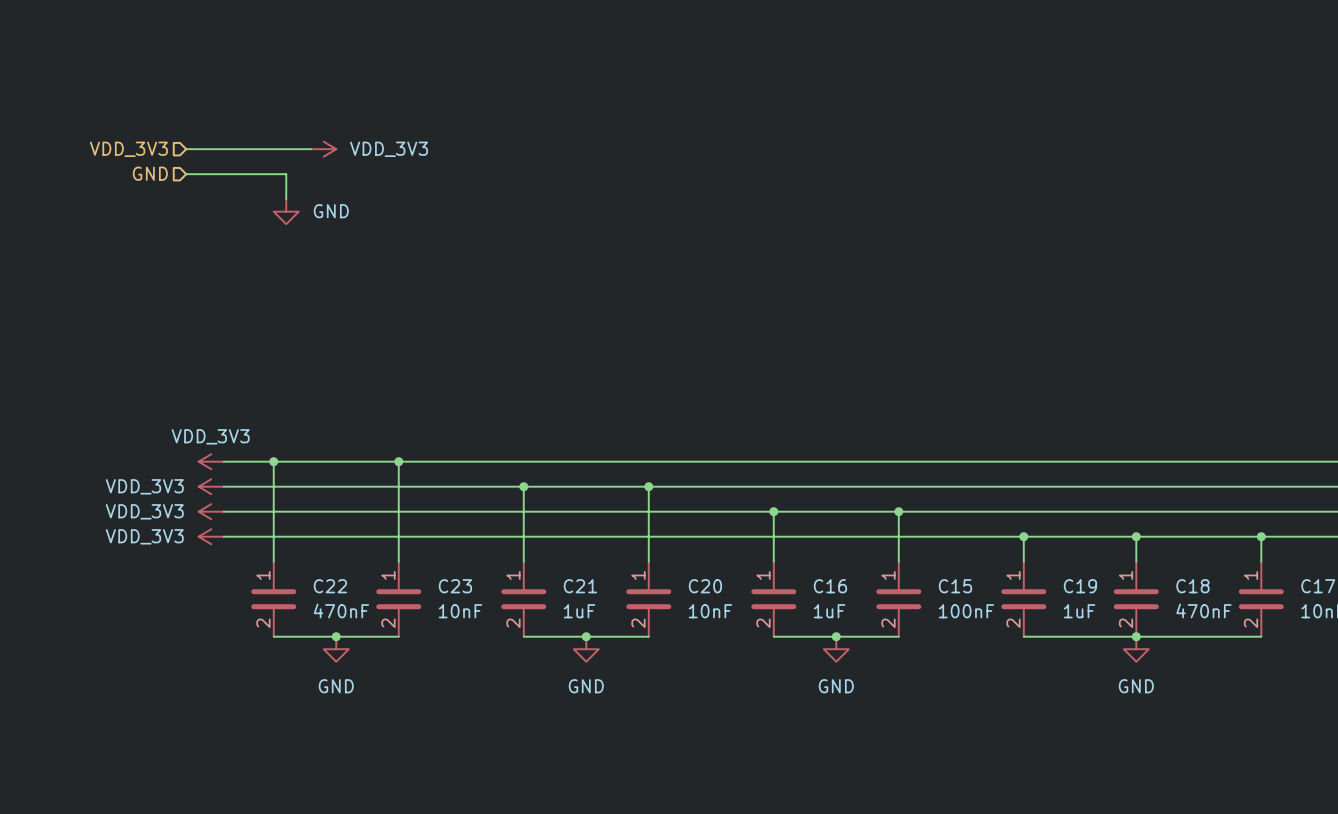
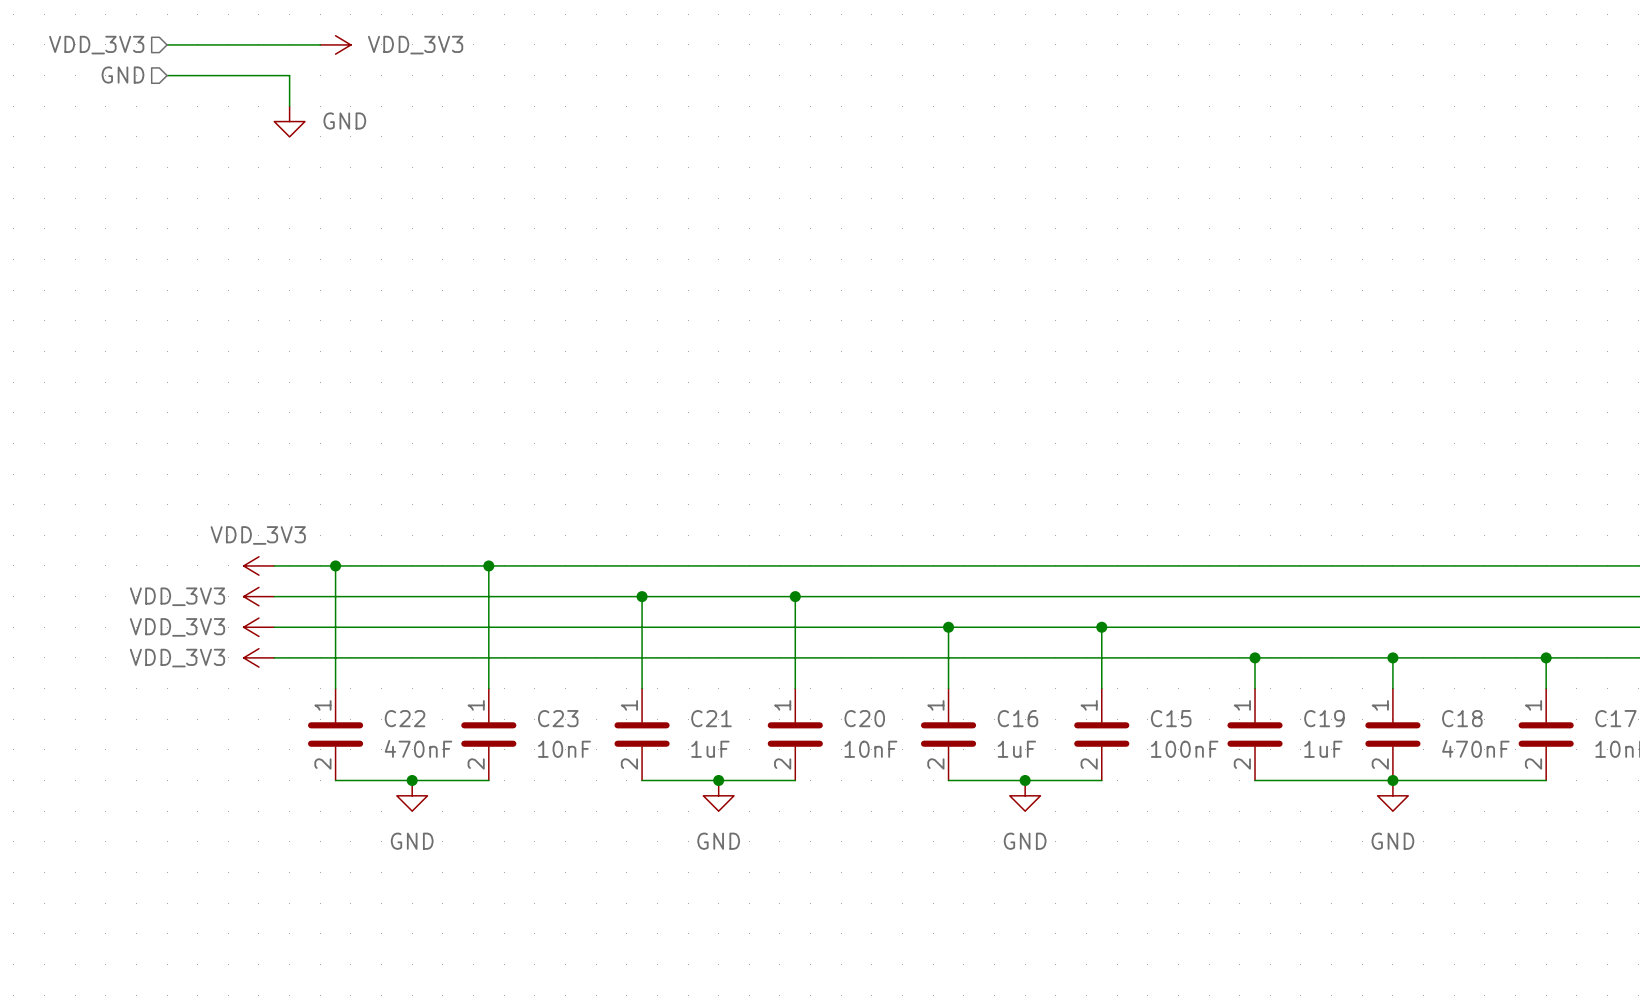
hierarchical label position: VDD_3V3 (128, 149) -> VDD_3V3 (96, 45)
wire: (186, 149) (311, 149) -> (167, 44) (320, 44)
power symbol position: VDD_3V3 (323, 149) -> VDD_3V3 (335, 44)
hierarchical label position: GND (150, 173) -> GND (122, 75)
wire: (186, 174) (286, 174) (286, 199) -> (167, 75) (289, 75) (289, 106)
power symbol position: GND (286, 211) -> GND (289, 121)

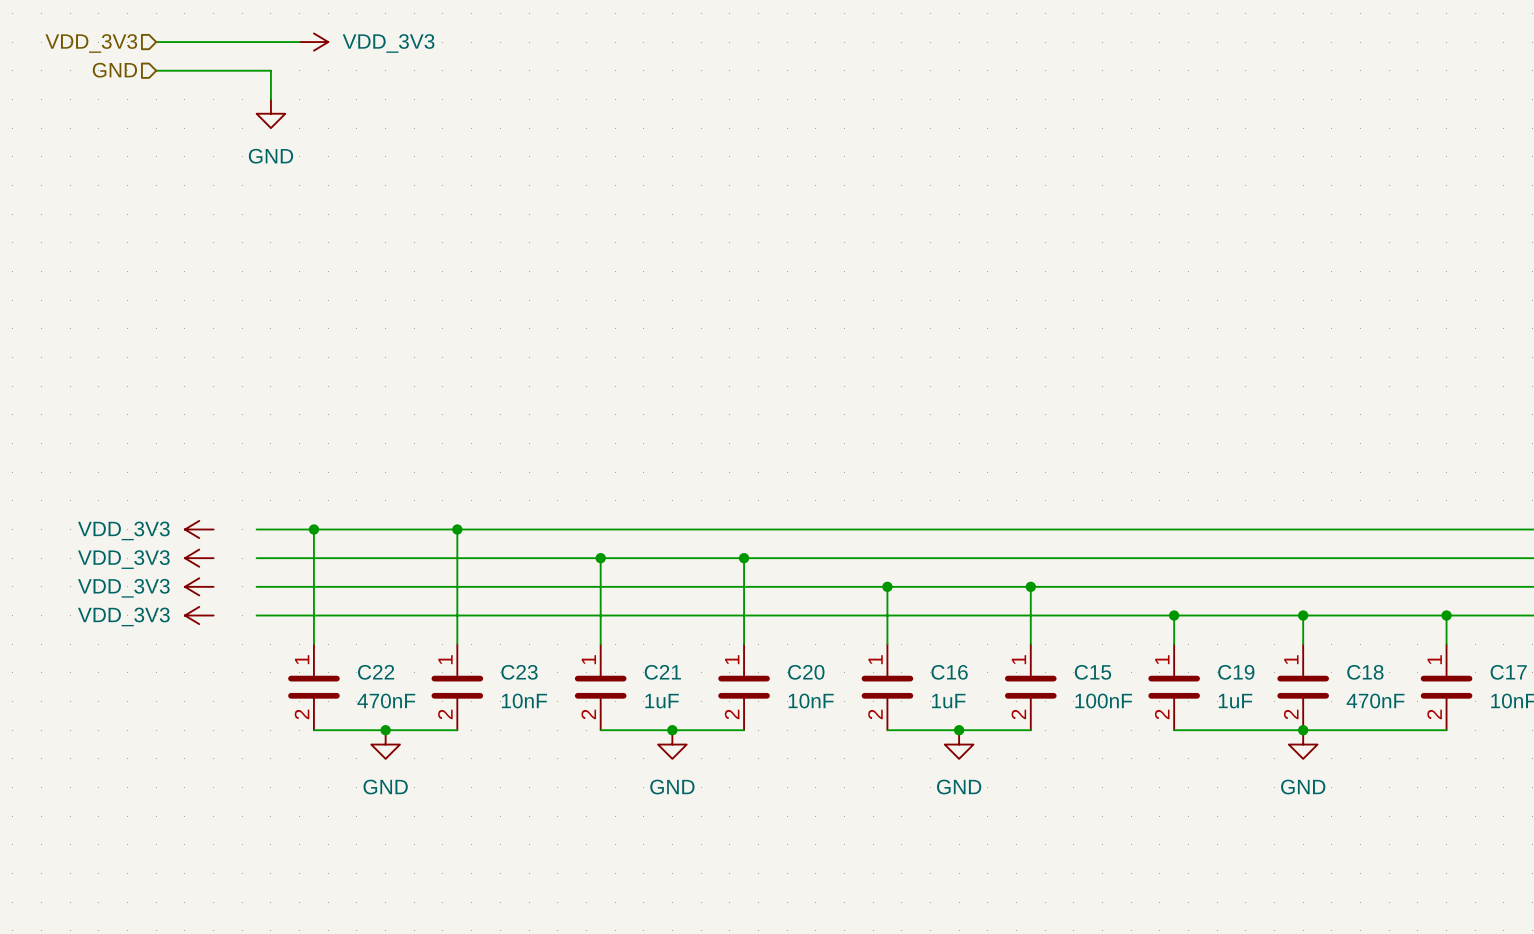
power symbol text position: GND (344, 120) -> GND (270, 156)
power symbol: none -> VDD_3V3 (199, 529)
power symbol: VDD_3V3 (258, 565) -> none
power symbol: none -> VDD_3V3 (199, 558)
power symbol: VDD_3V3 (258, 596) -> none
power symbol: none -> VDD_3V3 (199, 586)
power symbol: VDD_3V3 (258, 627) -> none
power symbol: none -> VDD_3V3 (199, 615)
power symbol: VDD_3V3 (258, 657) -> none

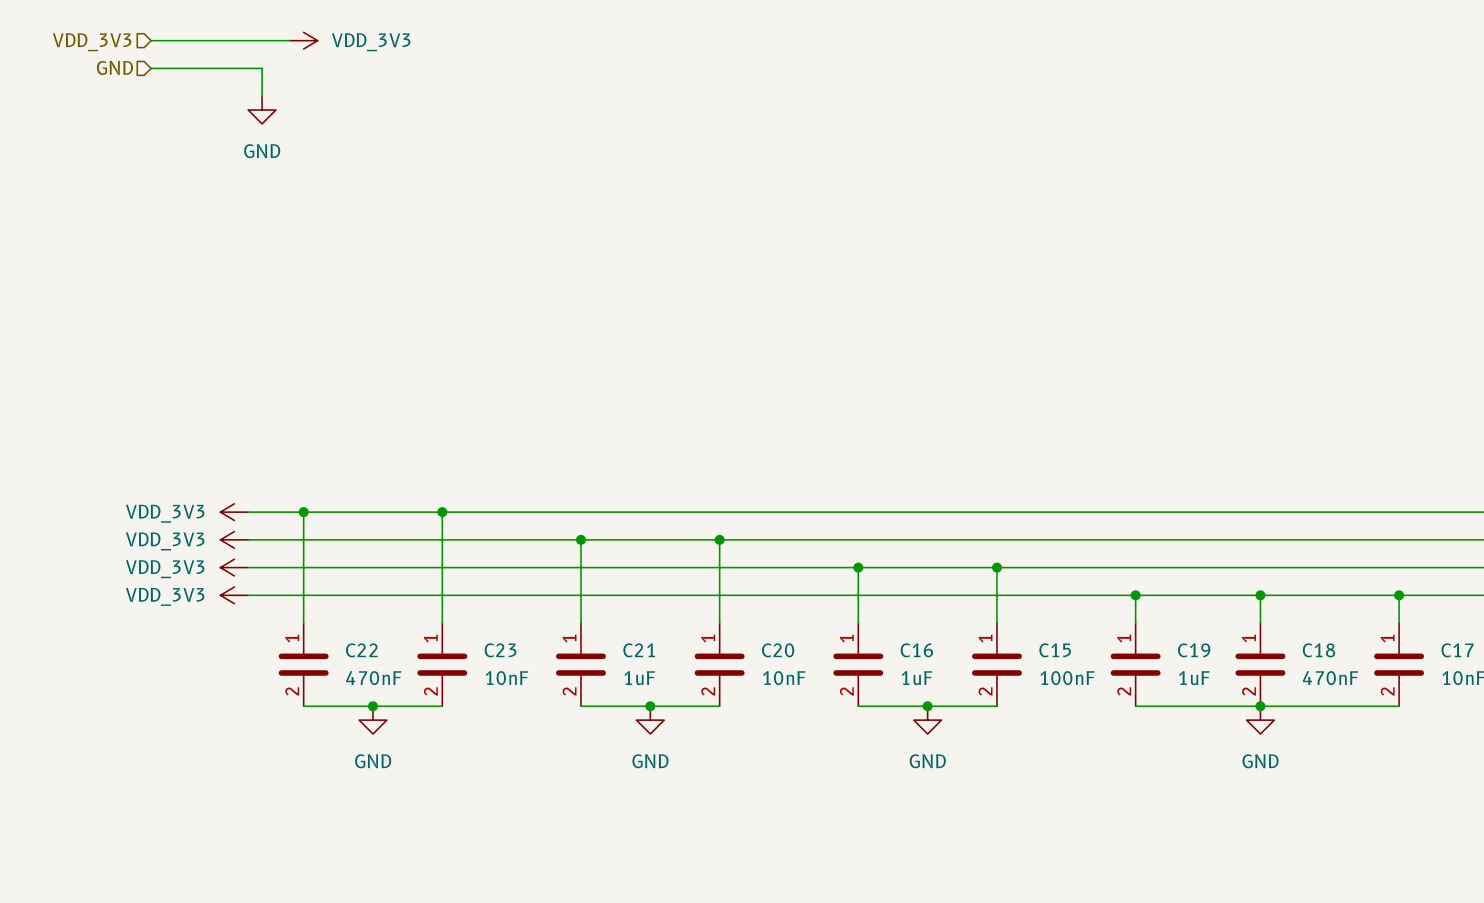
power symbol: VDD_3V3 (199, 529) -> none
power symbol: none -> VDD_3V3 (234, 512)
power symbol: VDD_3V3 (199, 558) -> none
power symbol: none -> VDD_3V3 (234, 539)
power symbol: VDD_3V3 (199, 586) -> none
power symbol: none -> VDD_3V3 (234, 567)
power symbol: VDD_3V3 (199, 615) -> none
power symbol: none -> VDD_3V3 (234, 595)

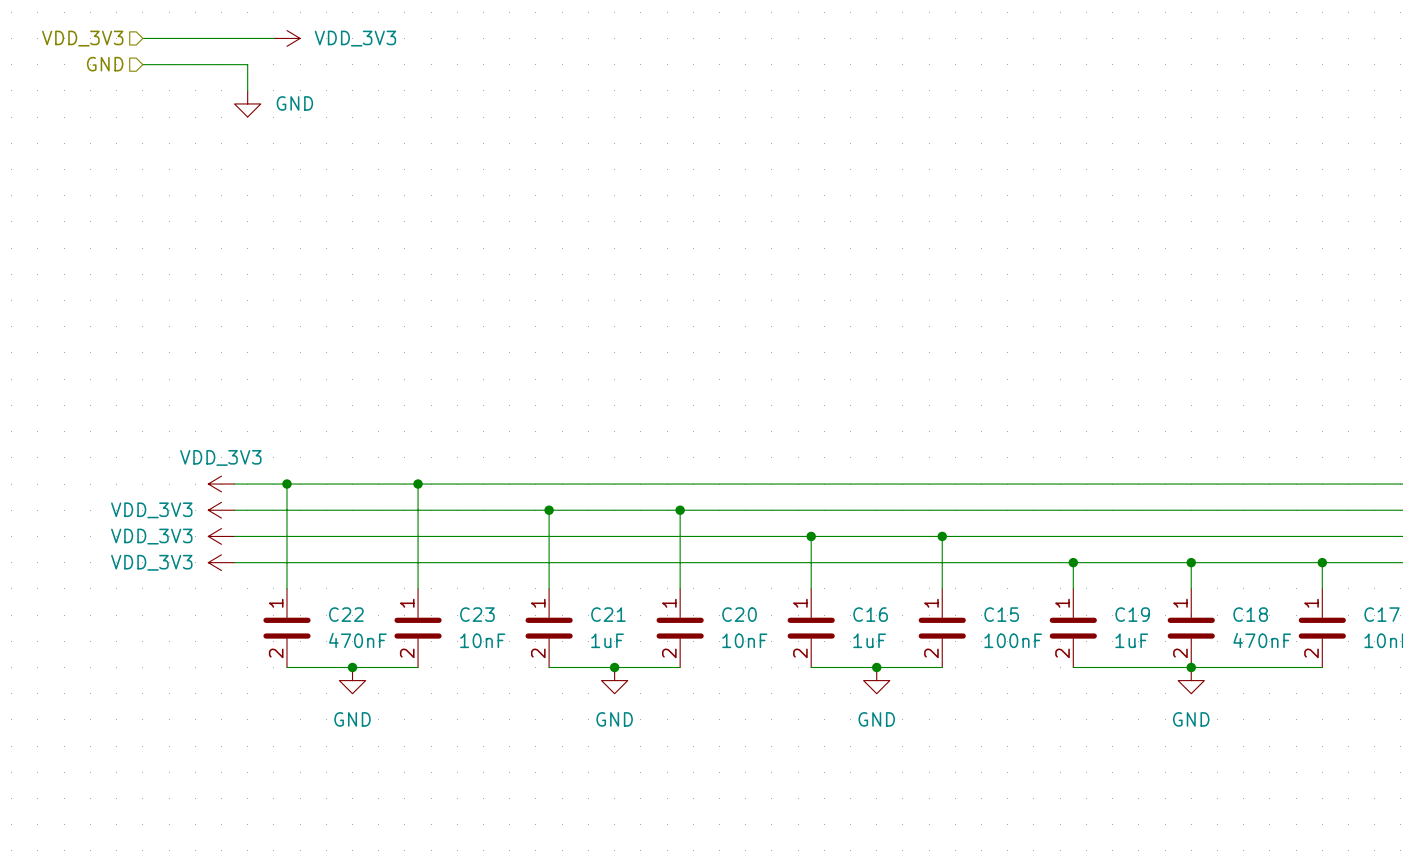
power symbol text position: GND (262, 151) -> GND (294, 103)
power symbol text position: VDD_3V3 (165, 513) -> VDD_3V3 (220, 457)

